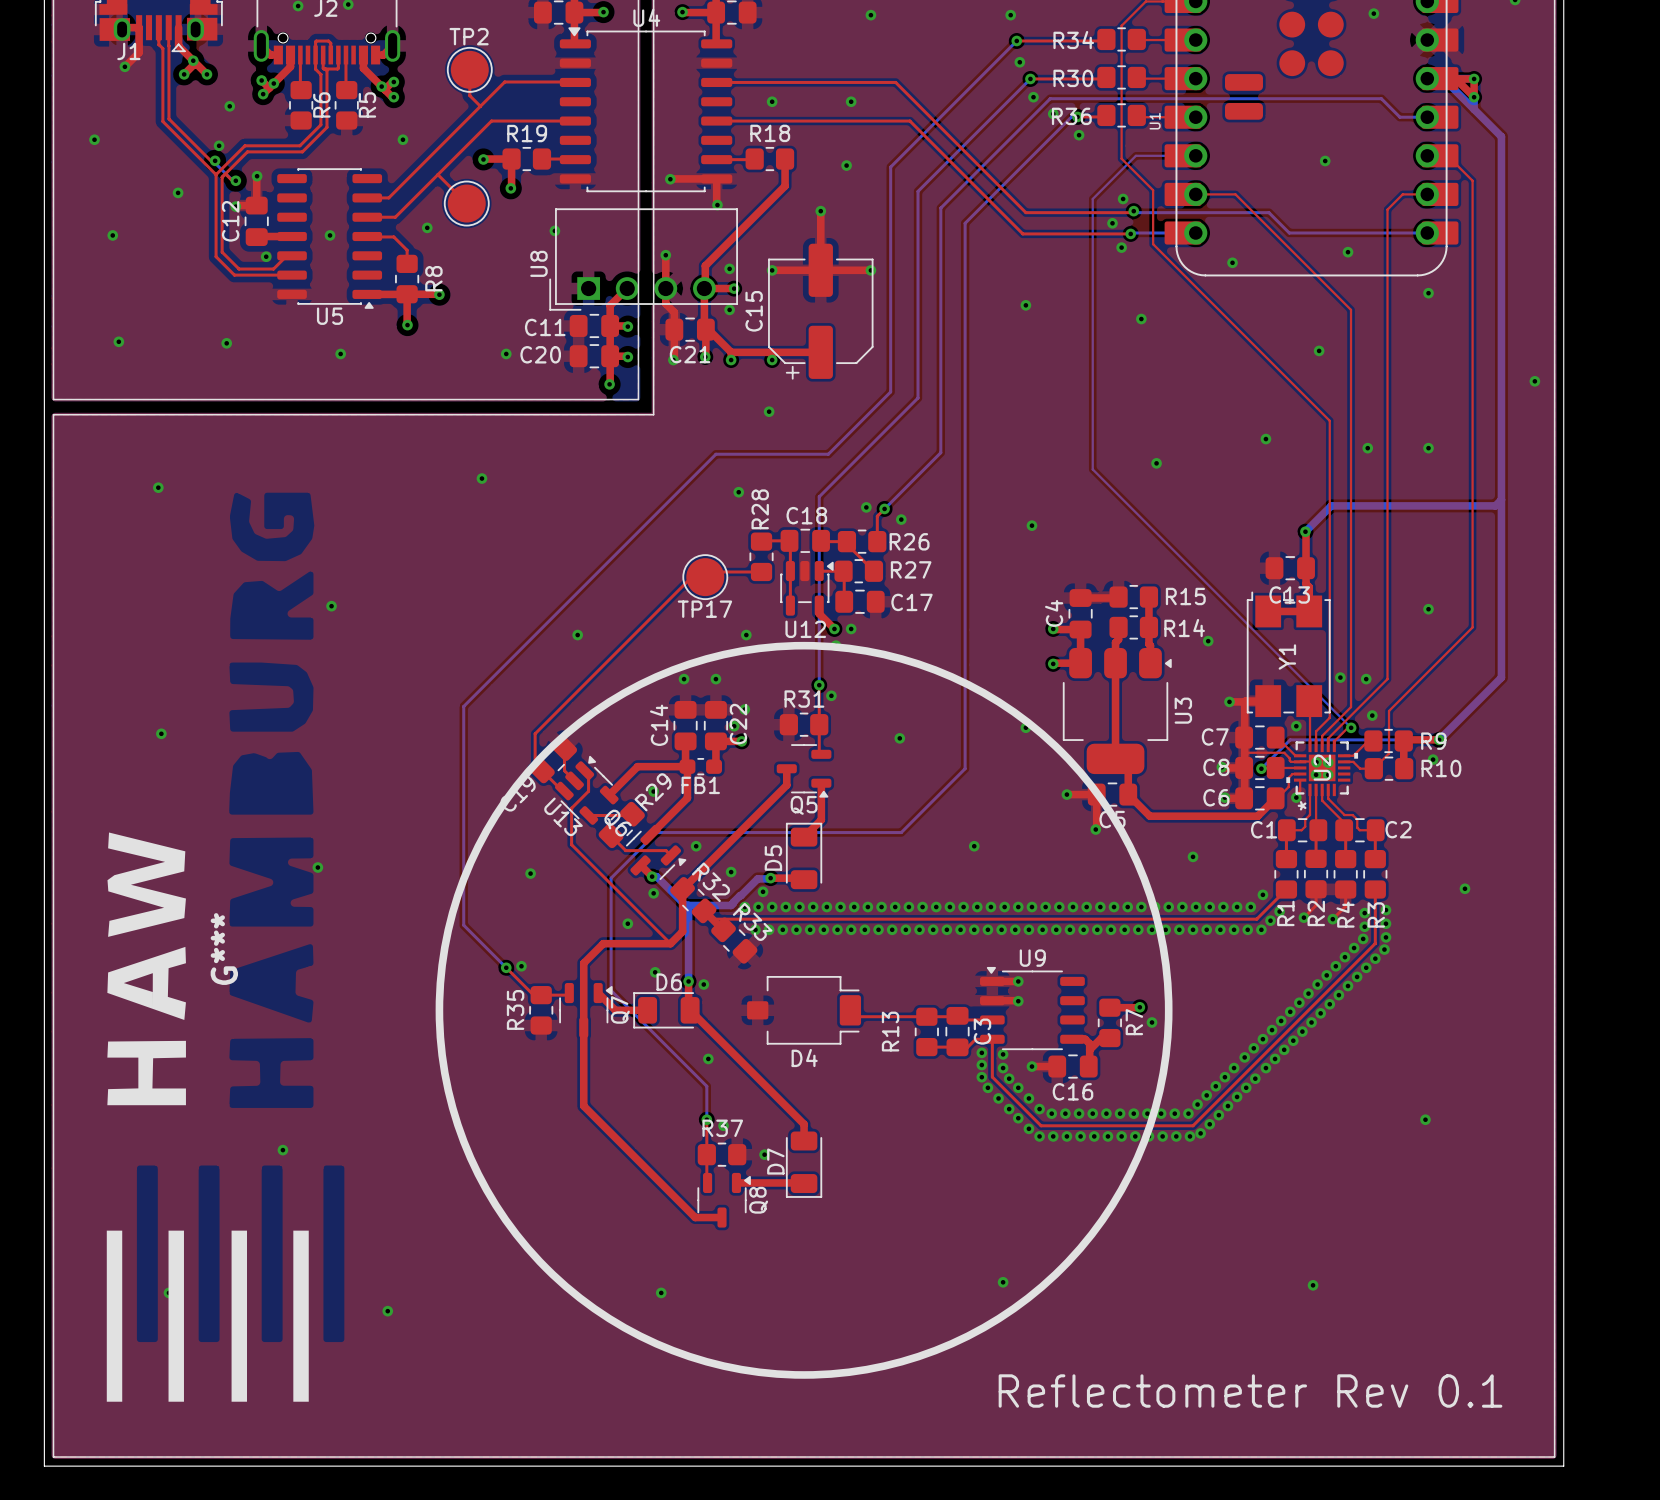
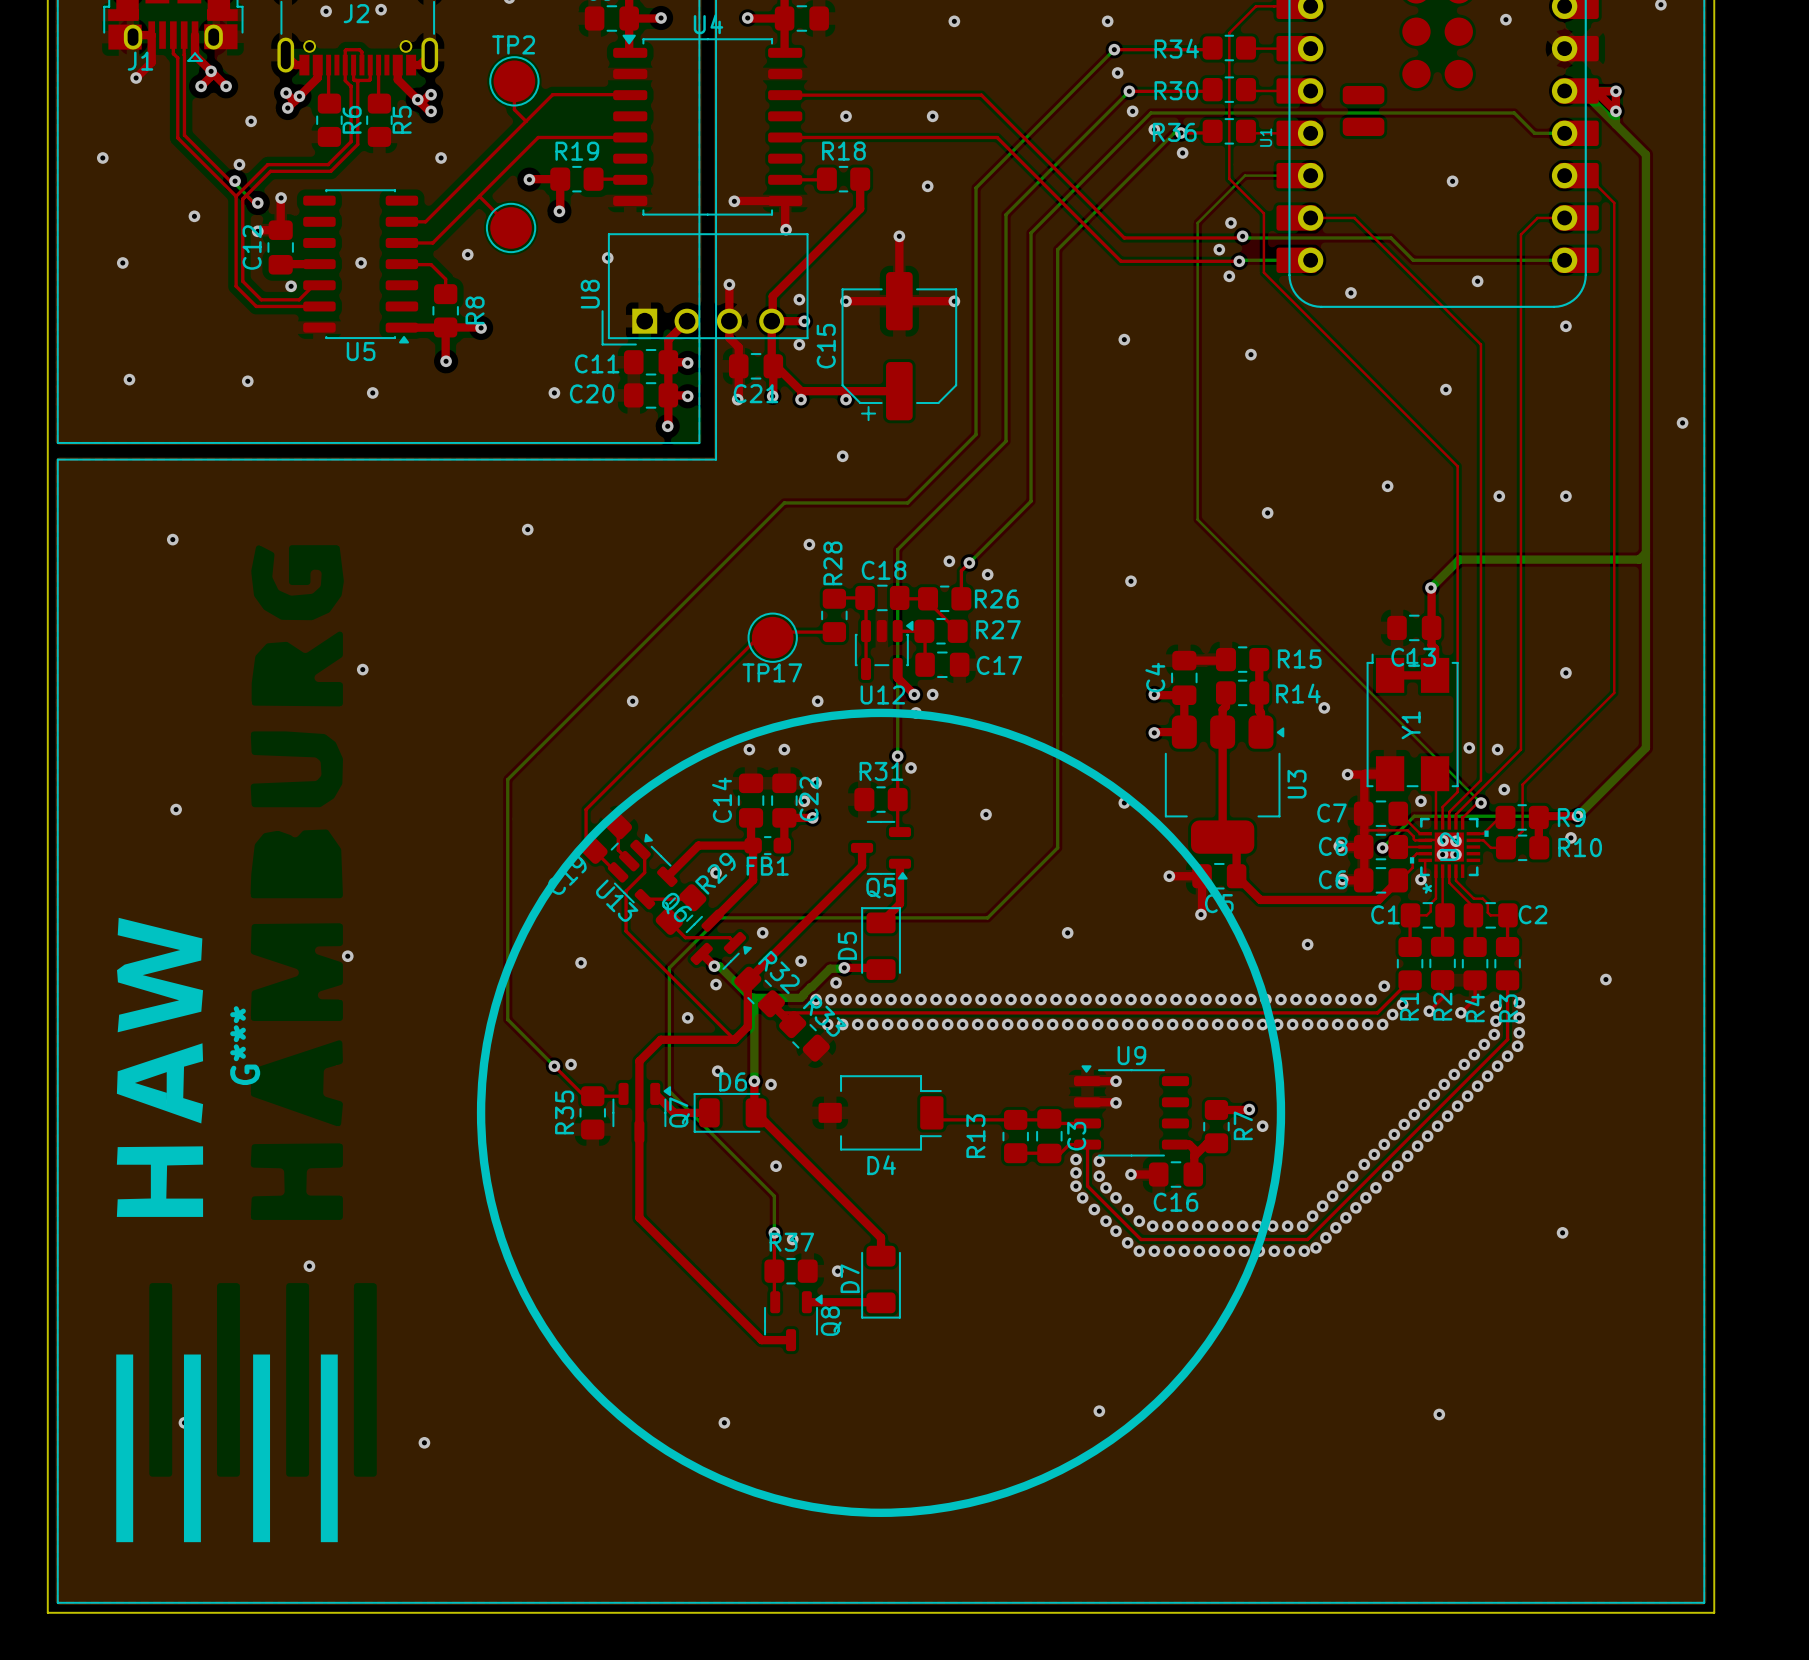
text: Reflectometer Rev 0.1 (1250, 1391) -> none

